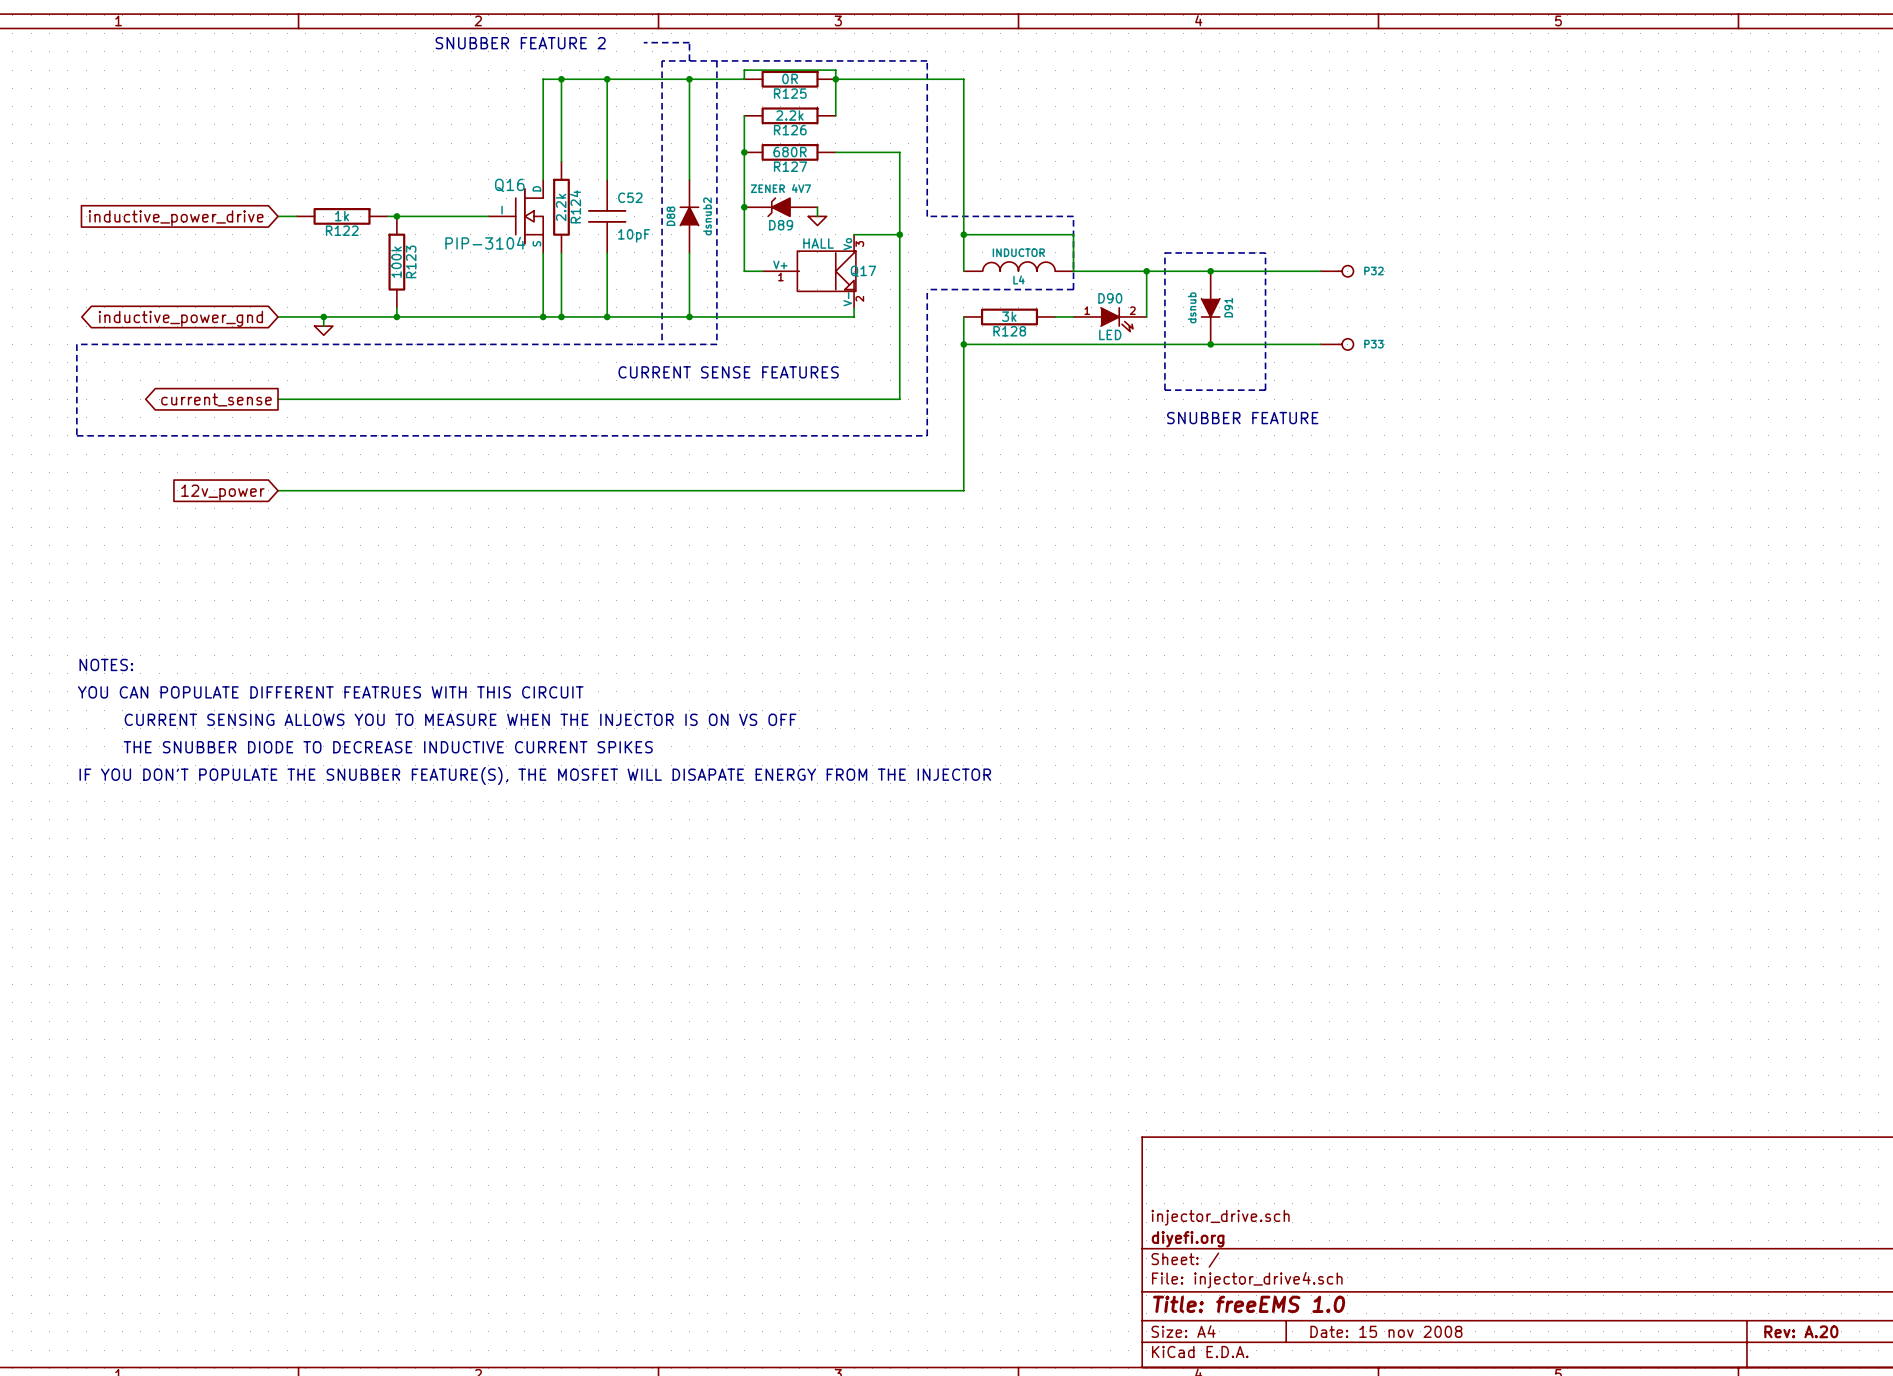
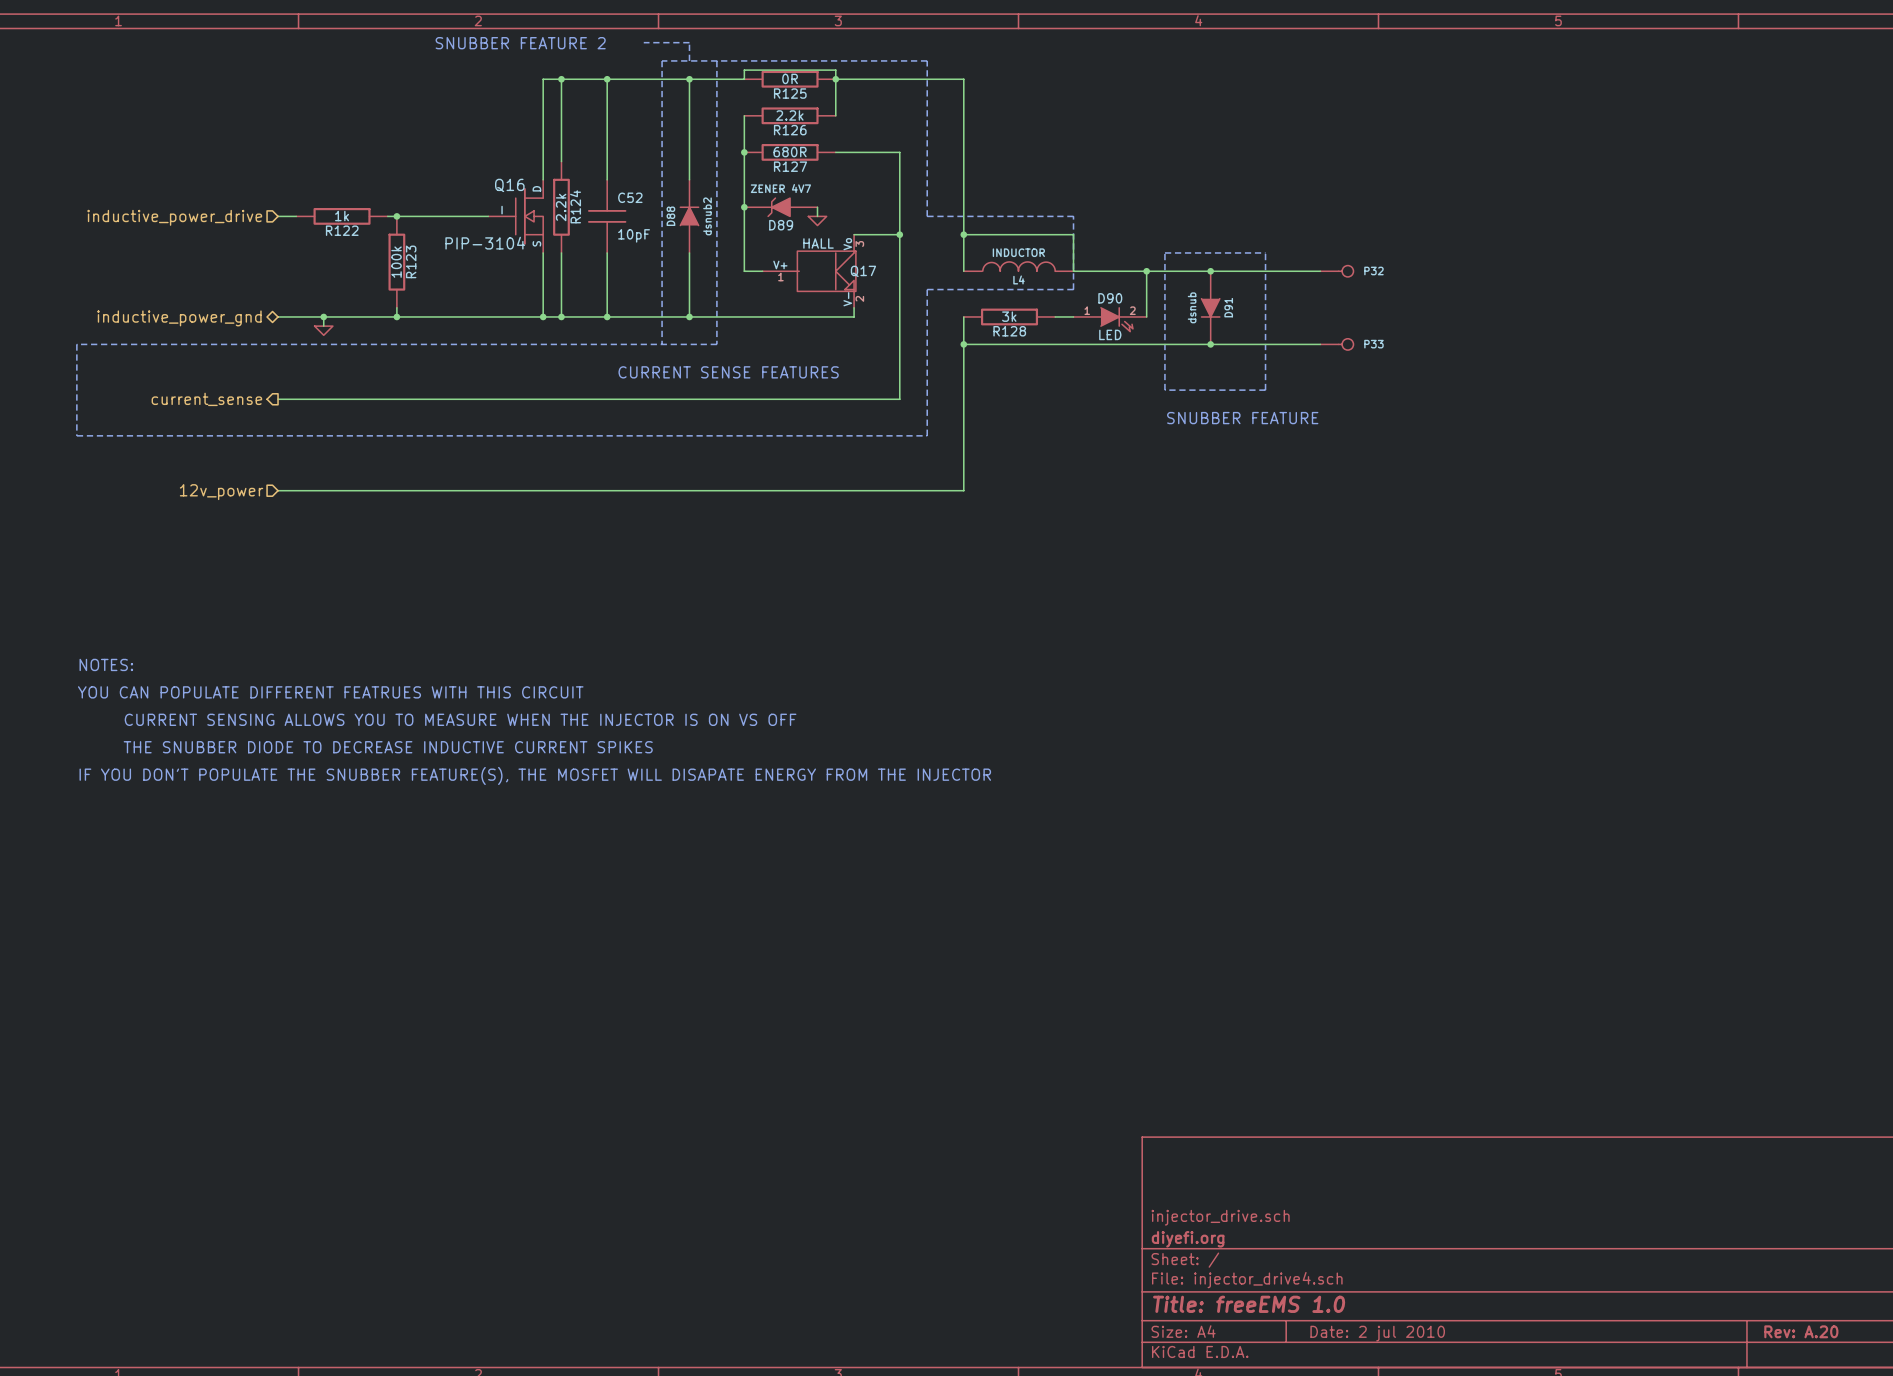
hierarchical label: none -> inductive_power_drive (174, 217)
global label: inductive_power_drive (176, 218) -> none
hierarchical label: none -> inductive_power_gnd (179, 318)
global label: inductive_power_gnd (180, 318) -> none
hierarchical label: none -> current_sense (206, 399)
global label: current_sense (216, 399) -> none
hierarchical label: none -> 12v_power (221, 492)
global label: 12v_power (222, 492) -> none
title block: Date: 15 nov 2008 (1386, 1331) -> Date: 2 jul 2010 (1377, 1333)

